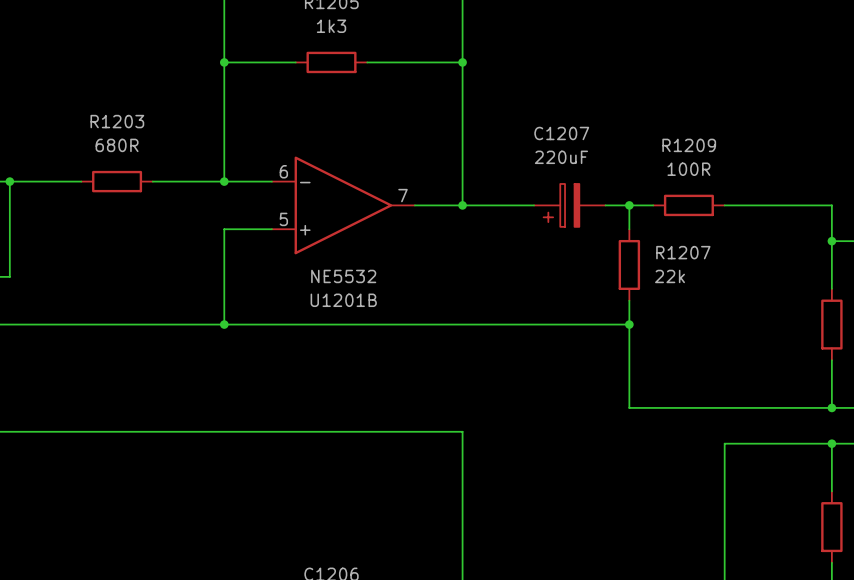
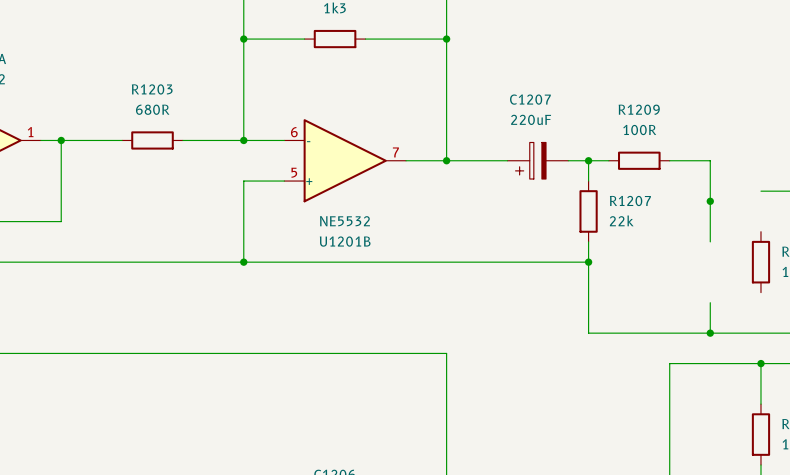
wire: (772, 205) (831, 205) (831, 288) -> (710, 160) (710, 241)
junction: (831, 241) -> none
junction: none -> (710, 201)
wire: (831, 360) (831, 407) -> none
wire: none -> (710, 302) (710, 333)
junction: none -> (710, 333)
junction: (831, 407) -> none

